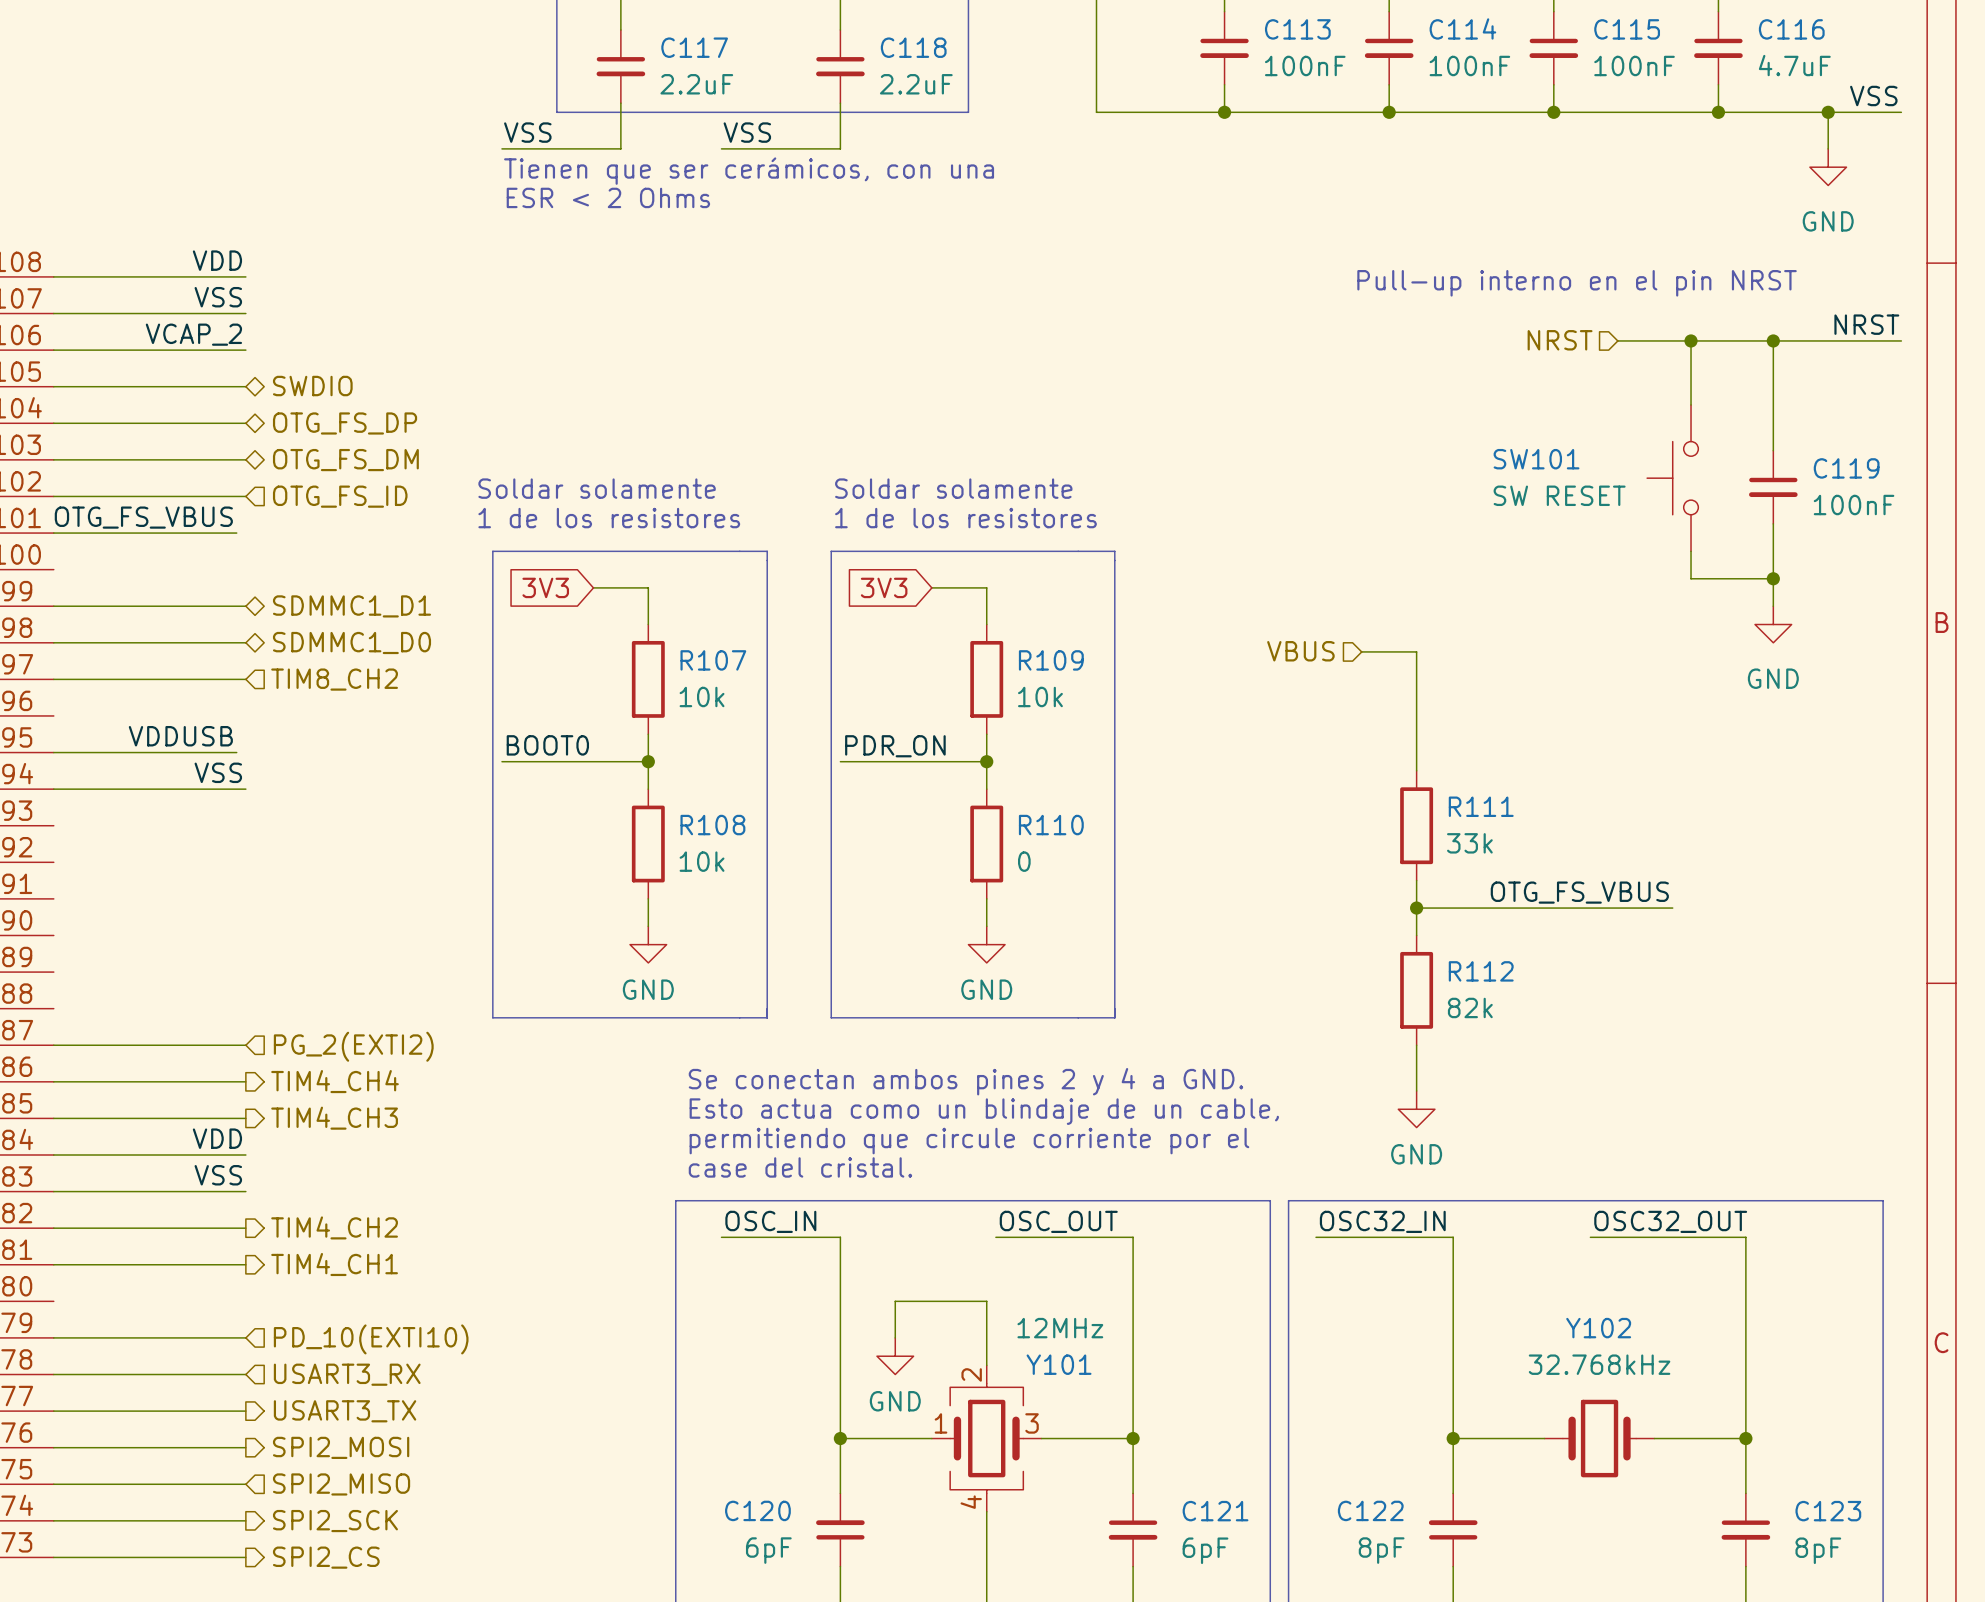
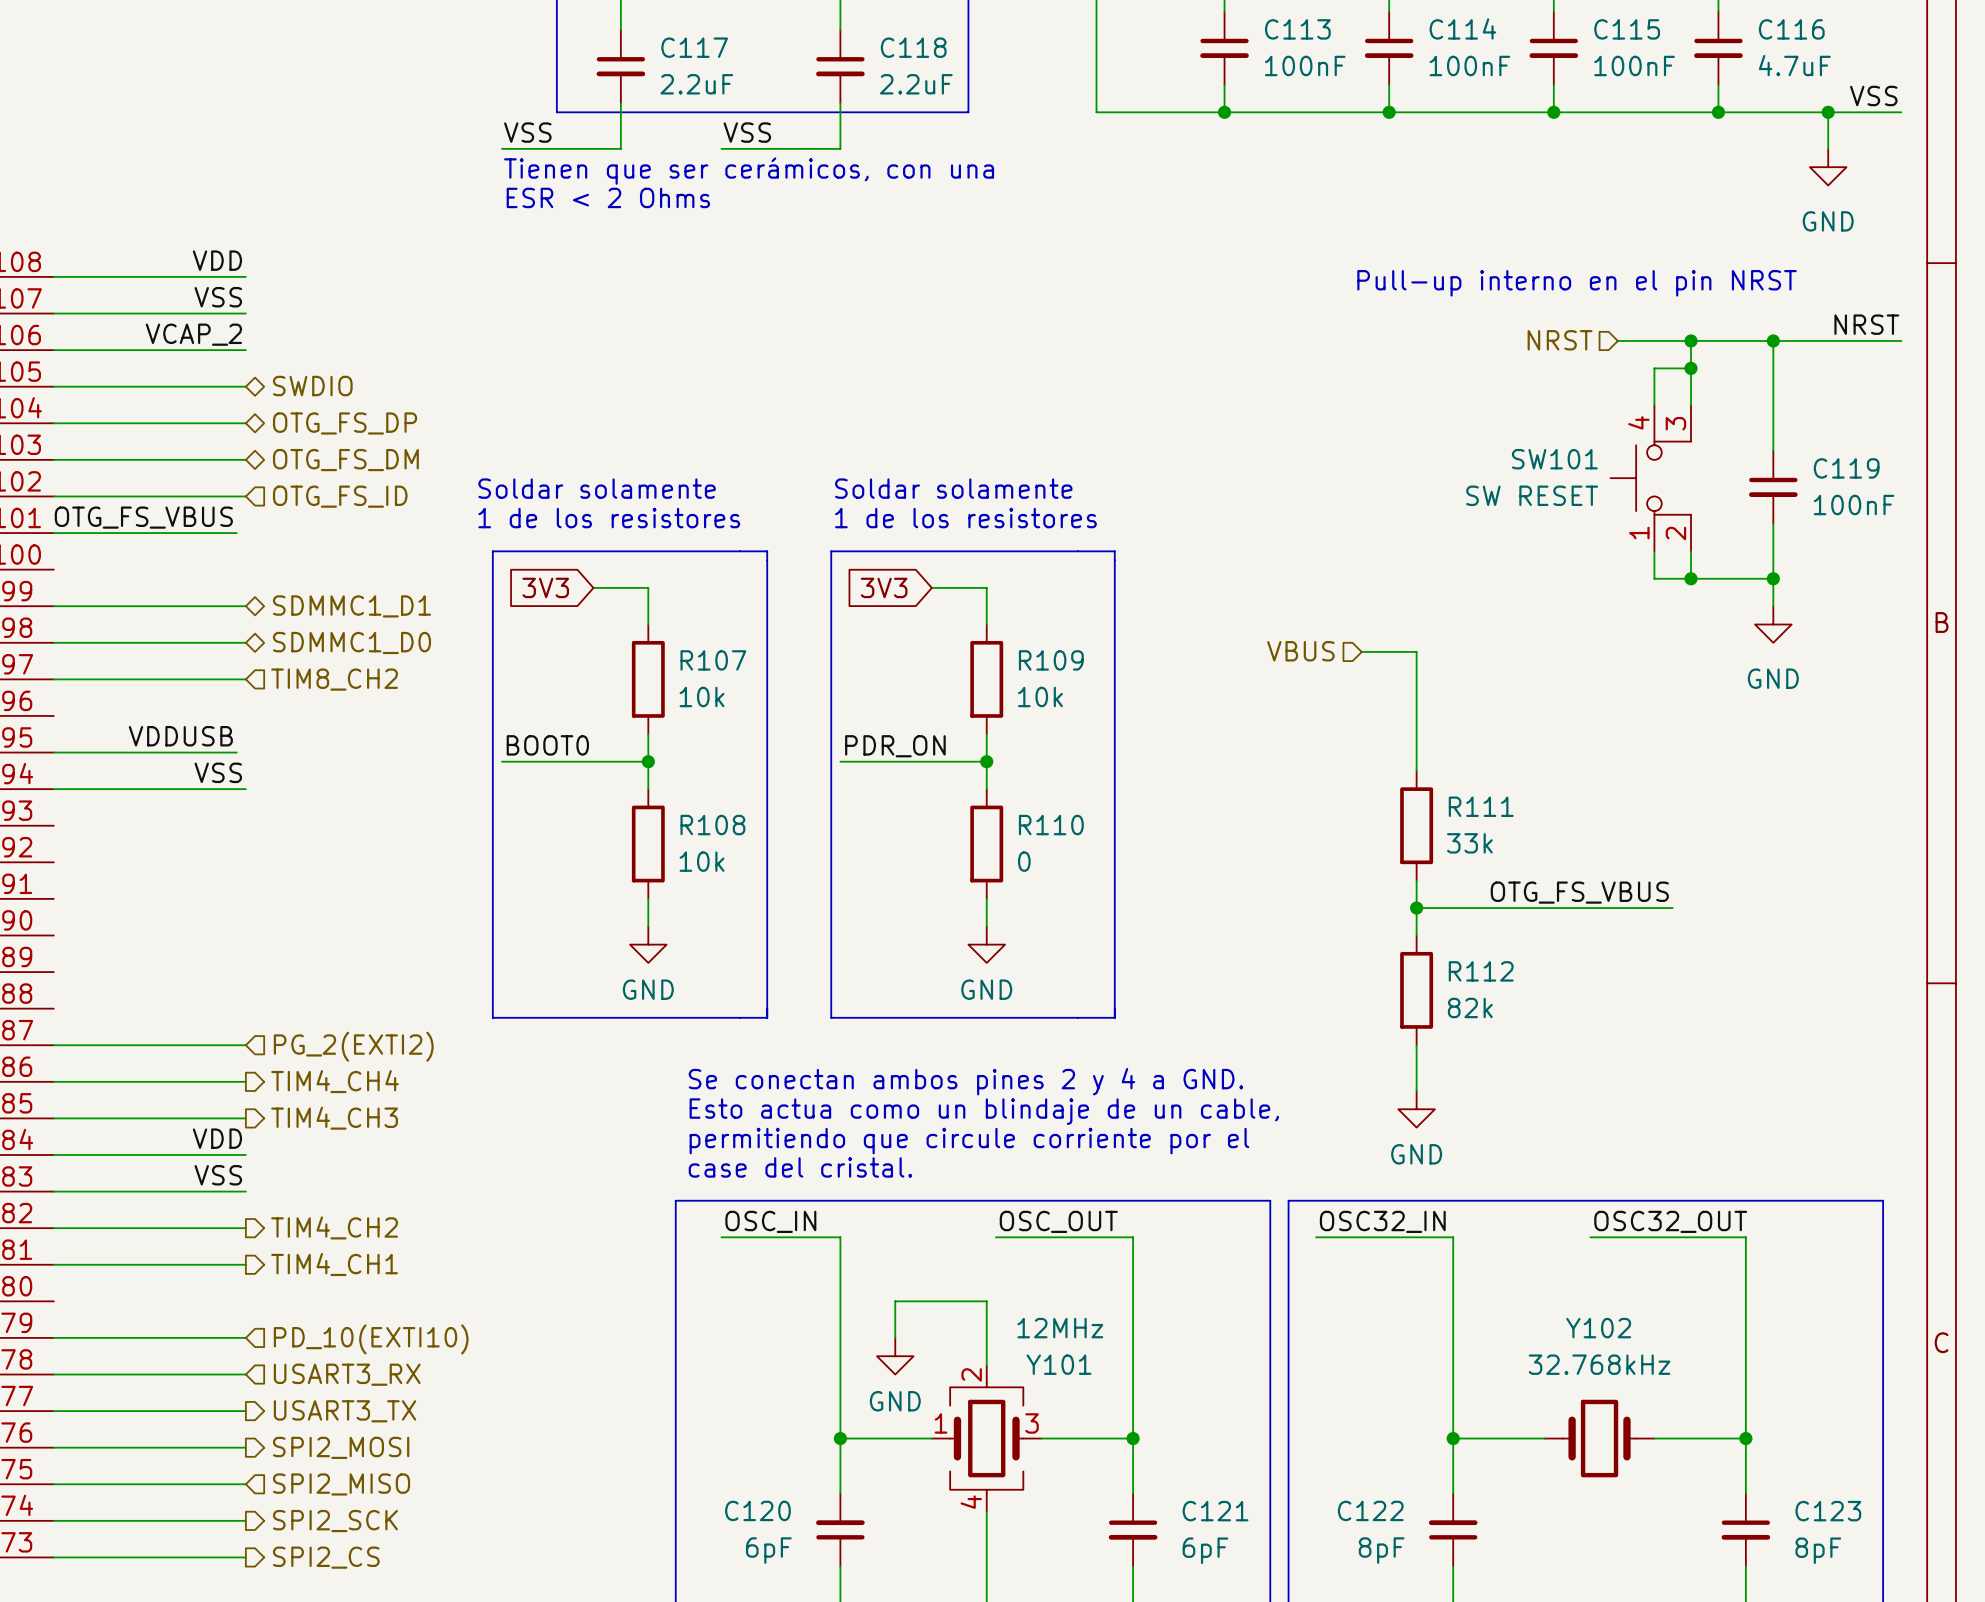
wire: none -> (1691, 368) (1654, 368) (1654, 404)
junction: none -> (1691, 368)
SW101 symbol: [1647, 404, 1699, 552] -> [1610, 404, 1692, 552]
SW101 name position: SW101 (1536, 459) -> SW101 (1554, 459)
wire: none -> (1654, 551) (1654, 578) (1691, 578)
junction: none -> (1691, 578)

